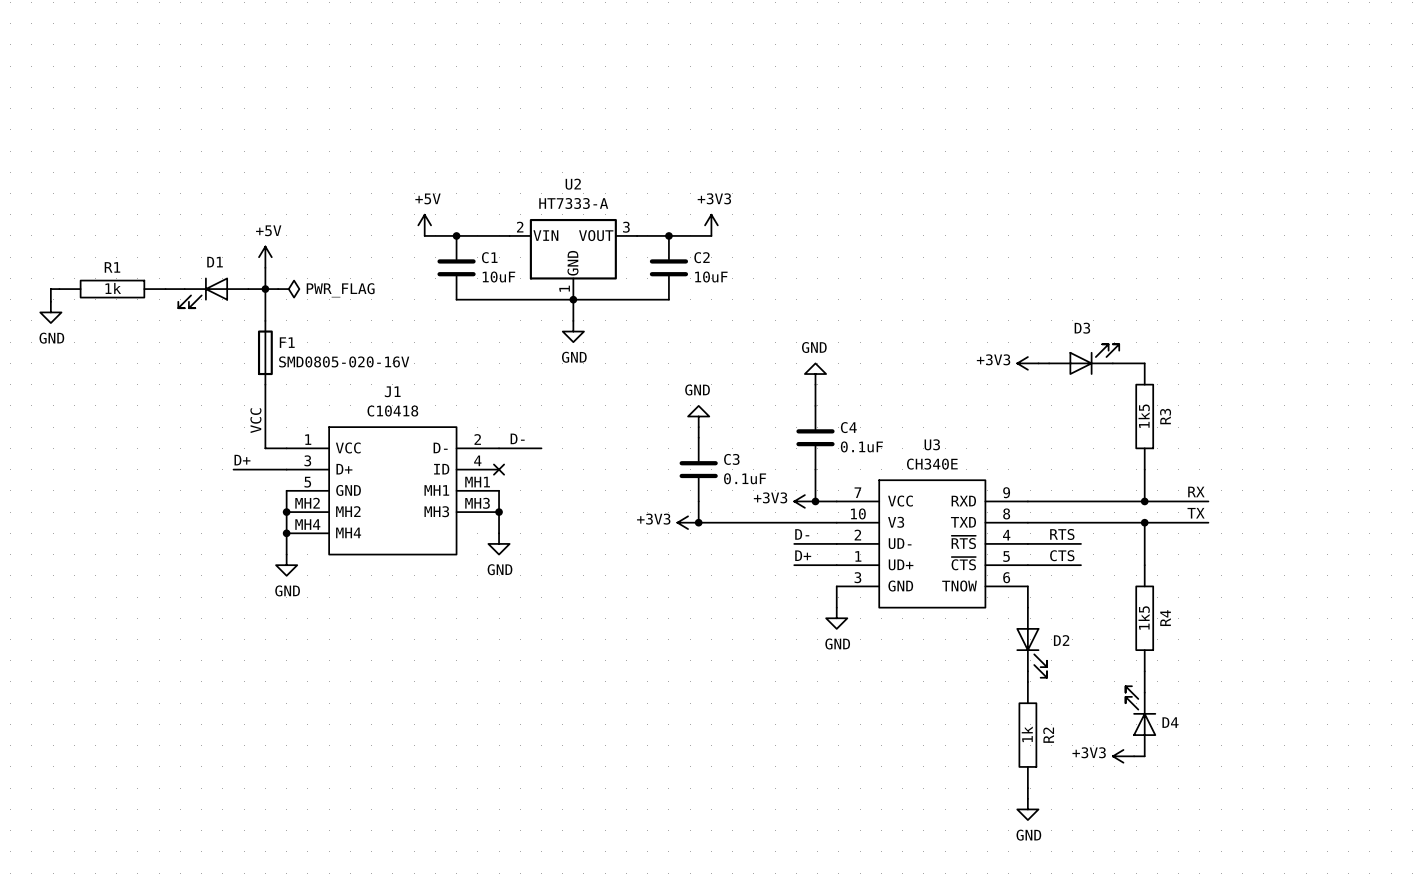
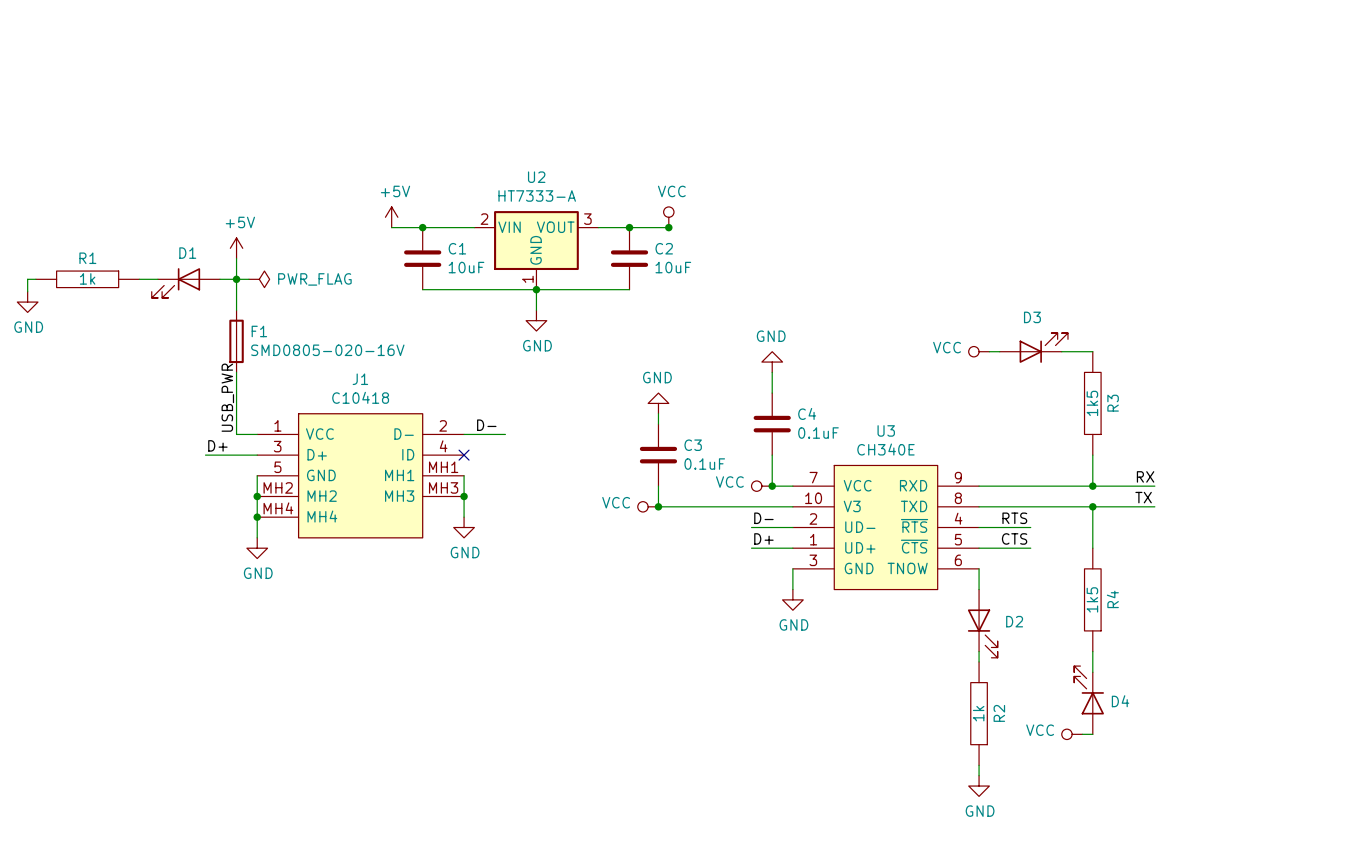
power symbol: +3V3 (711, 225) -> VCC (668, 217)
junction: none -> (668, 227)
power symbol: +3V3 (1027, 363) -> VCC (979, 351)
label: none -> USB_PWR (227, 397)
label: VCC (255, 420) -> none
power symbol: +3V3 (804, 501) -> VCC (761, 486)
power symbol: +3V3 (688, 522) -> VCC (648, 506)
power symbol: +3V3 (1123, 756) -> VCC (1072, 734)

